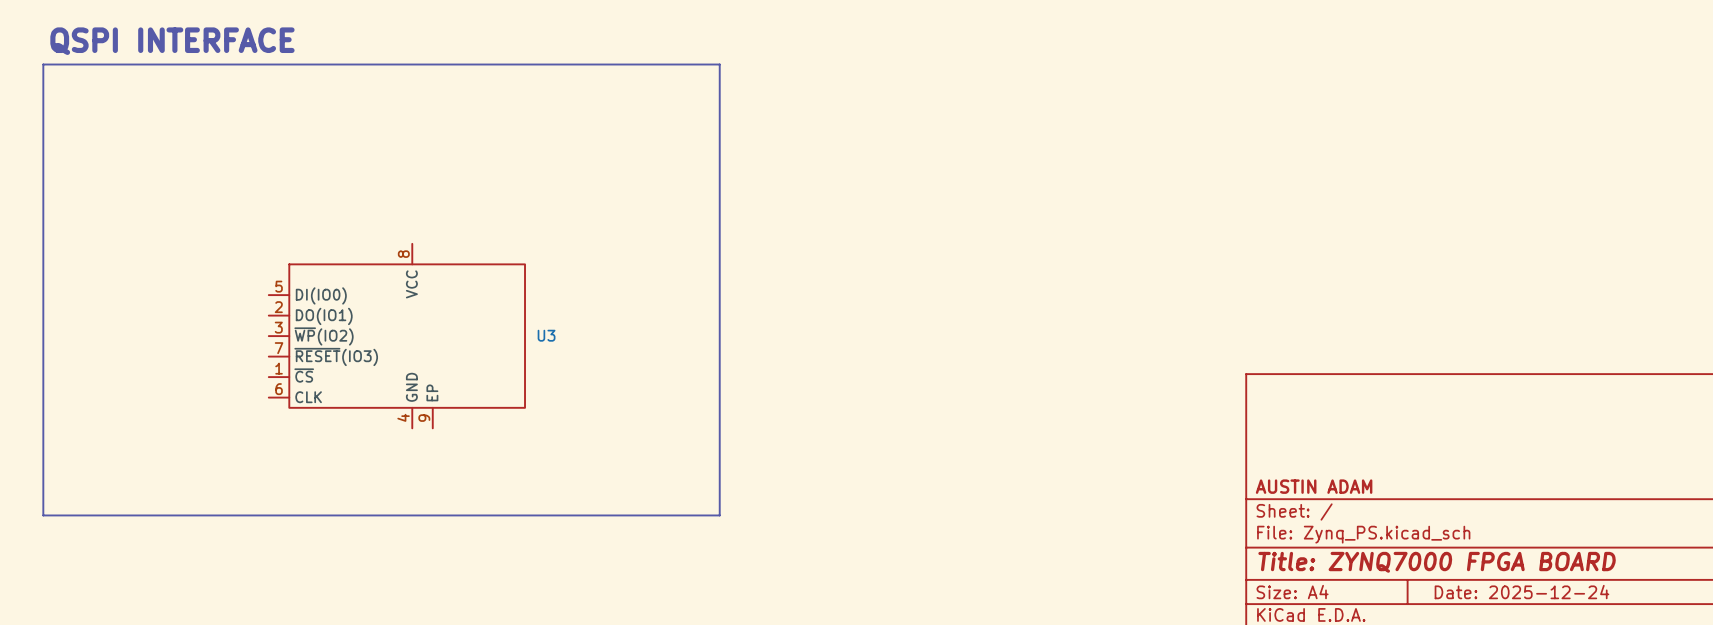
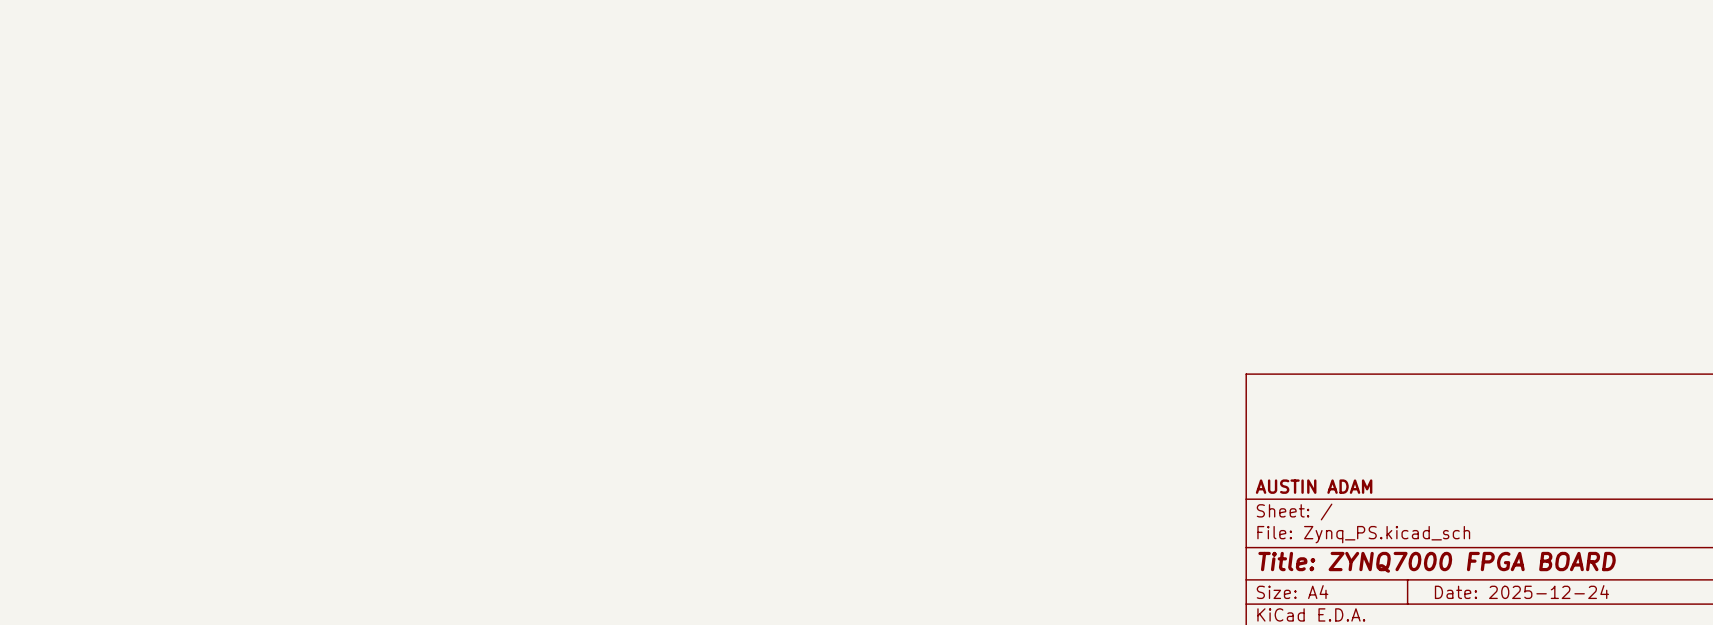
text: QSPI INTERFACE (172, 41) -> none
line: (43, 64) (719, 64) (719, 515) (43, 515) (43, 64) -> none
U3: (396, 336) -> none

